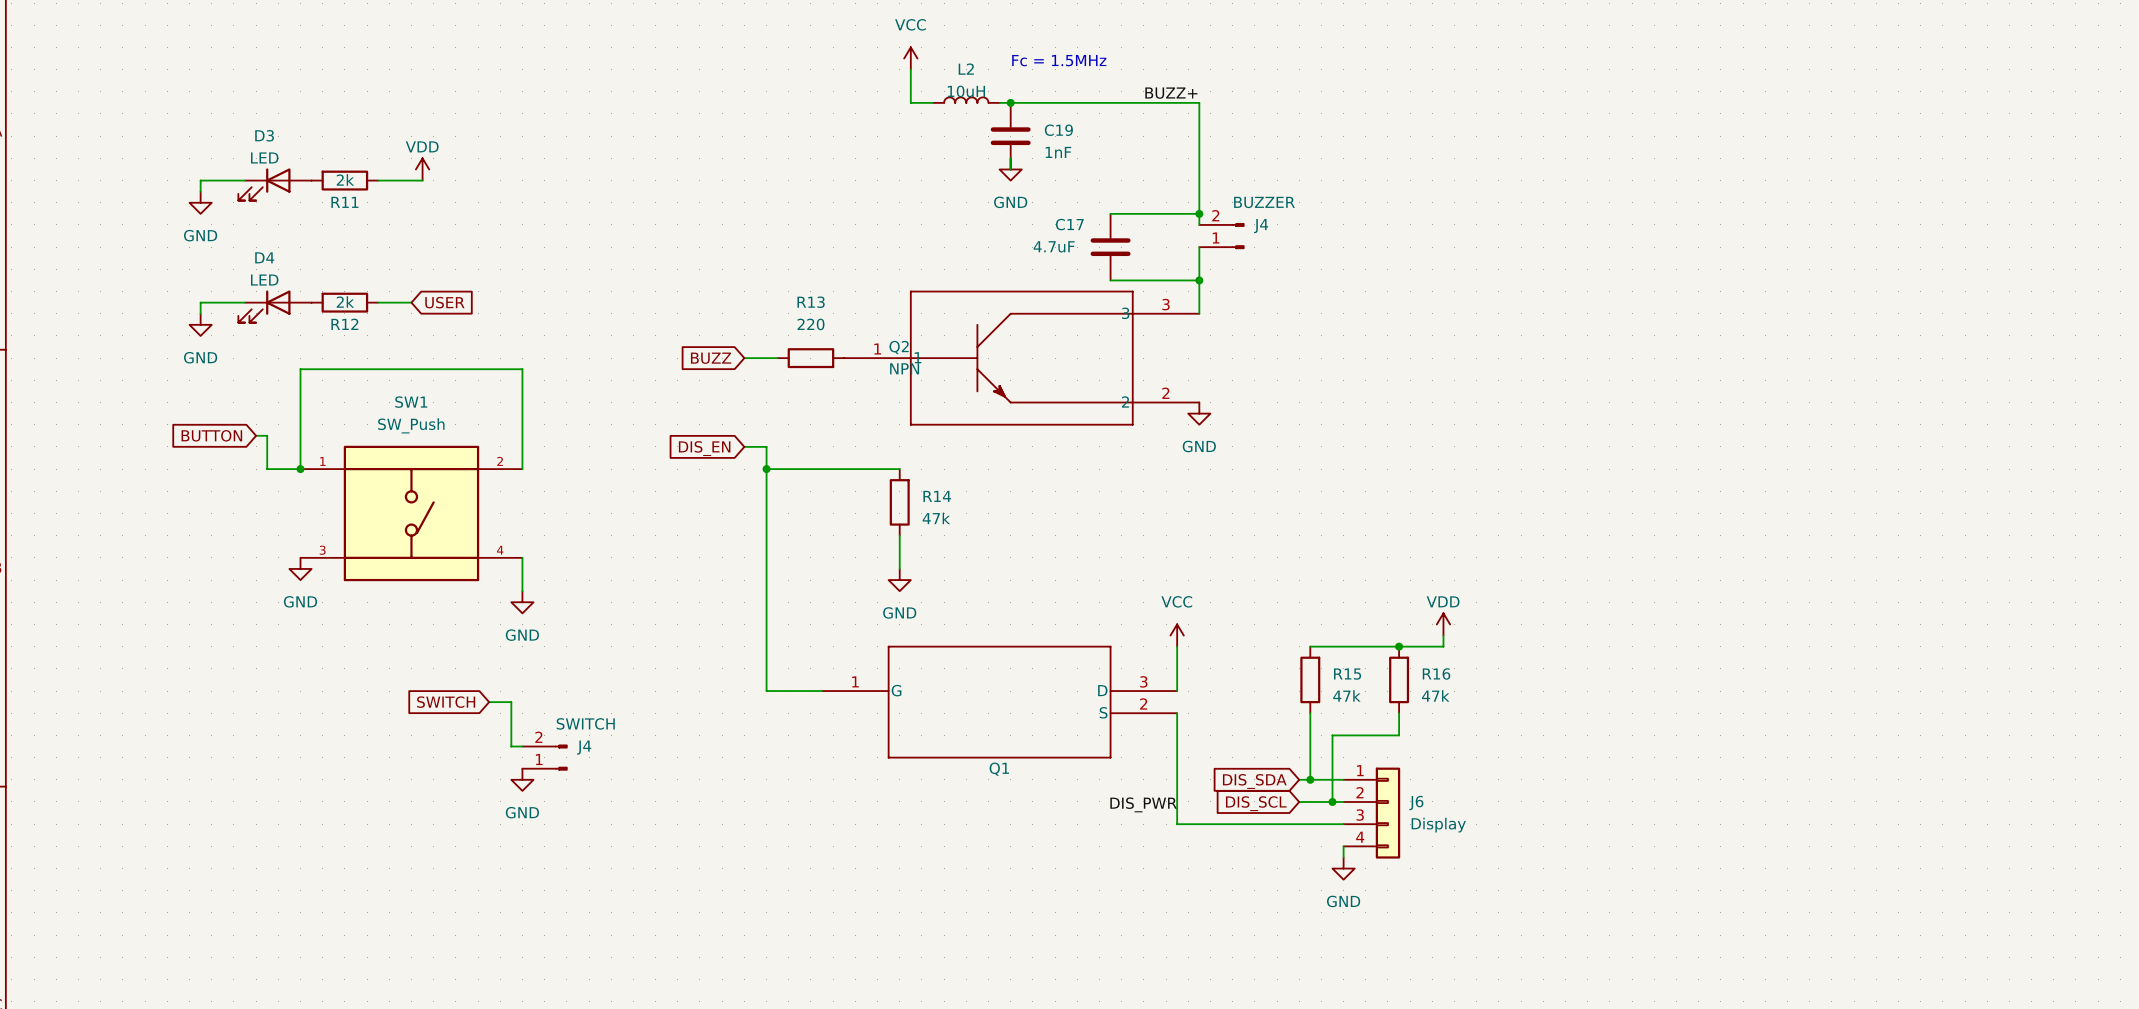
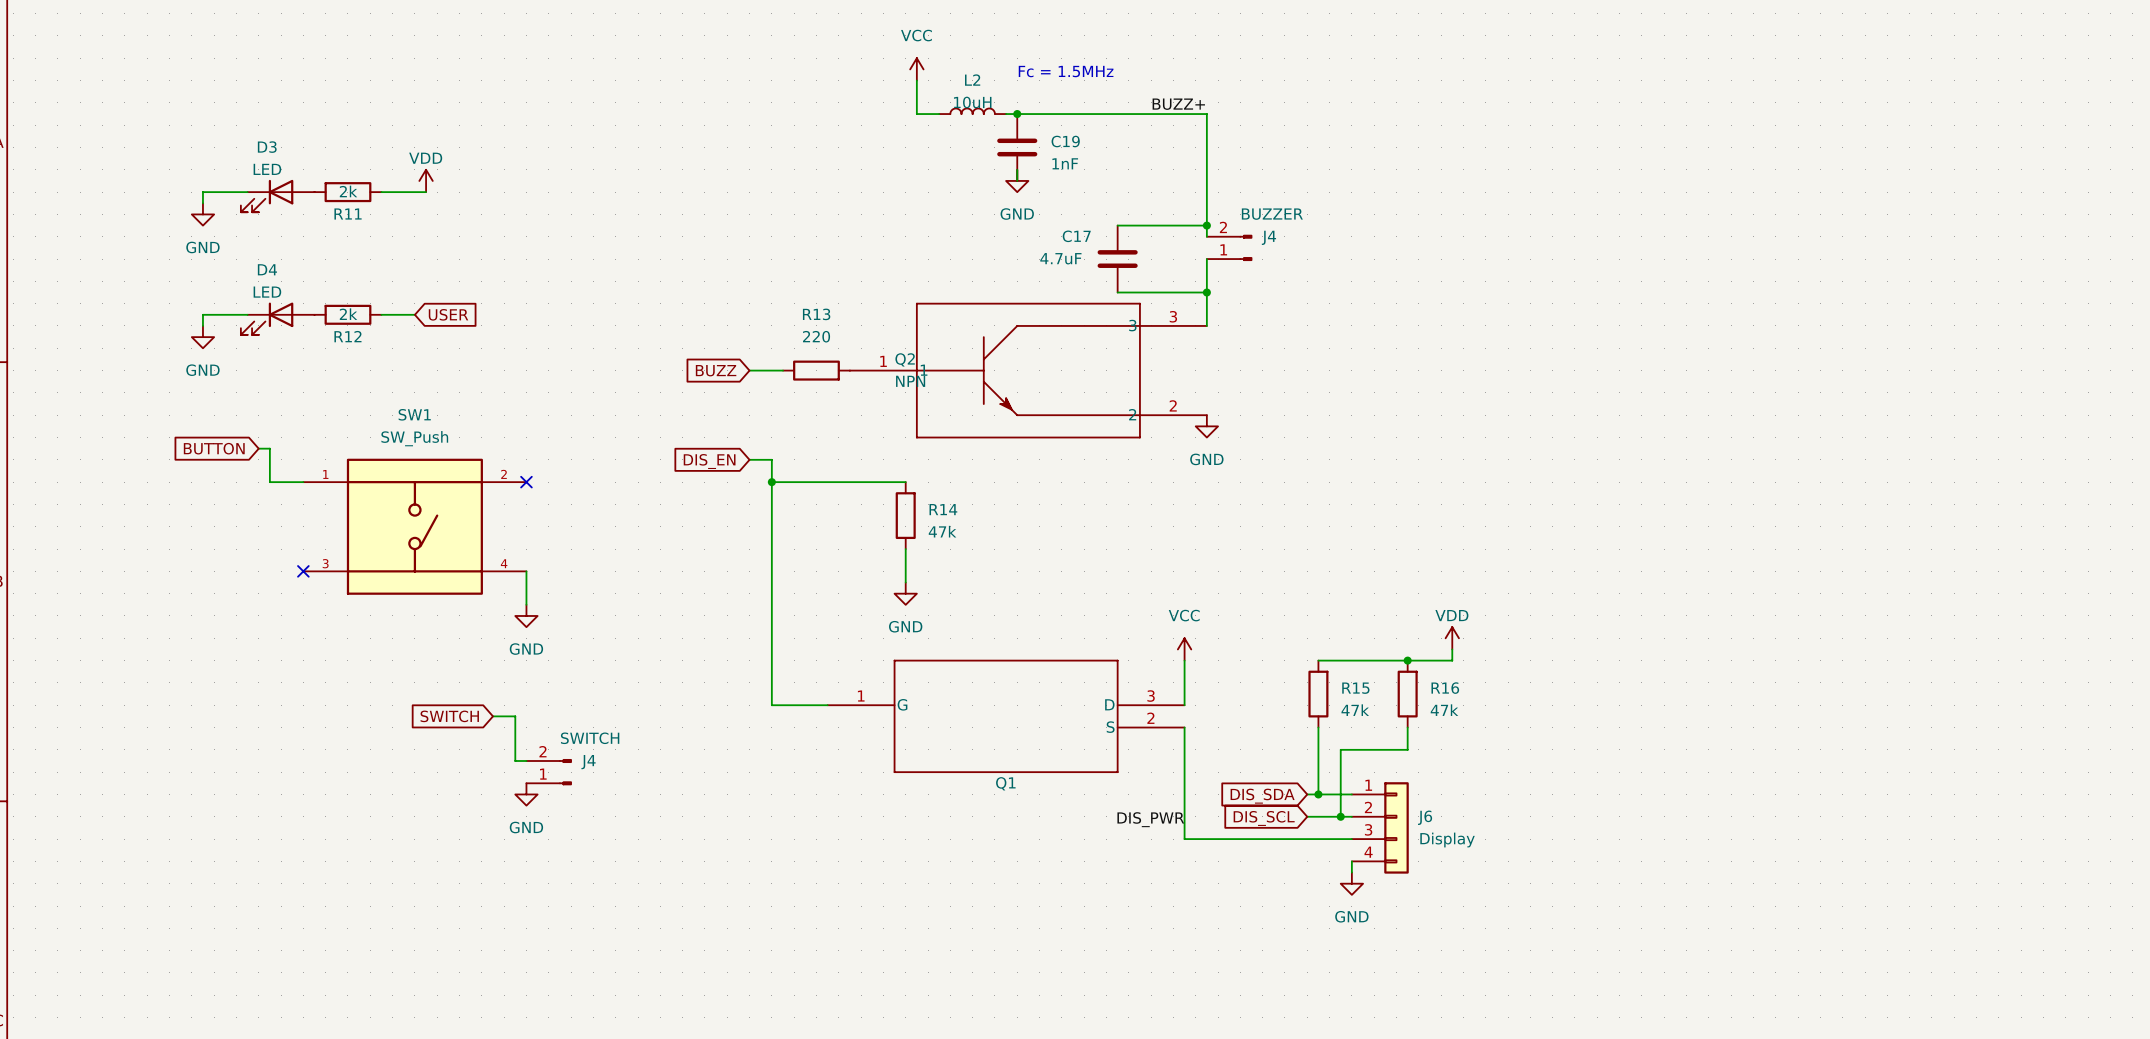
wire: (300, 469) (300, 369) (522, 369) (522, 469) -> none
junction: (300, 469) -> none
no-connect mark: none -> (526, 482)
no-connect mark: none -> (303, 571)
power symbol: GND (300, 568) -> none

